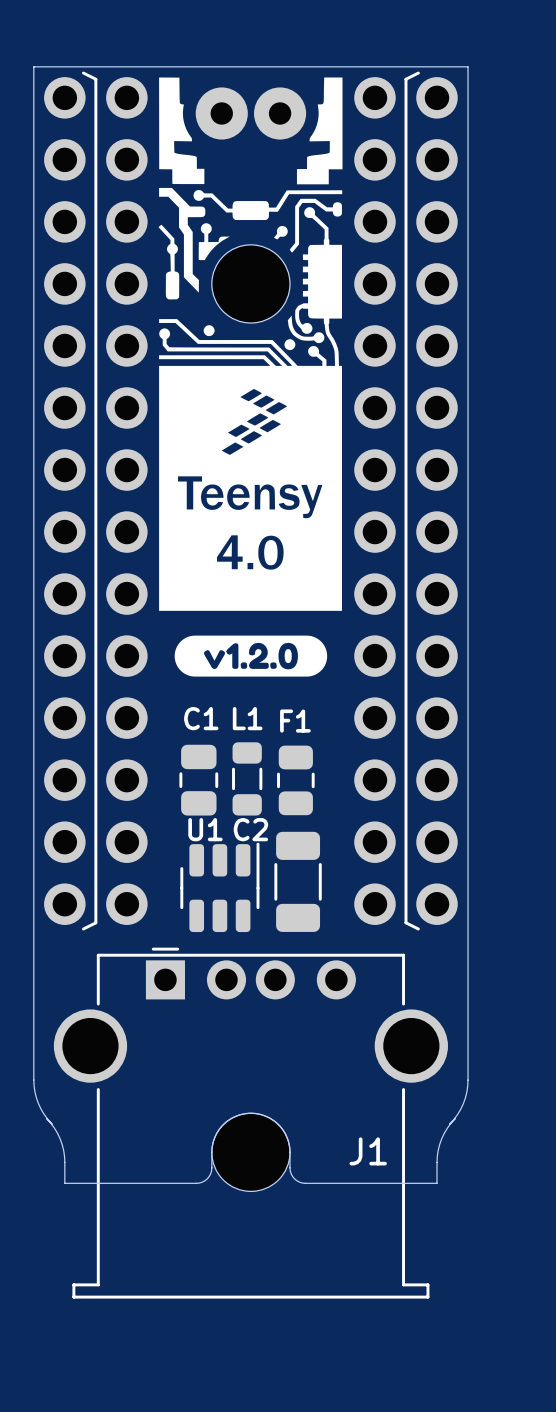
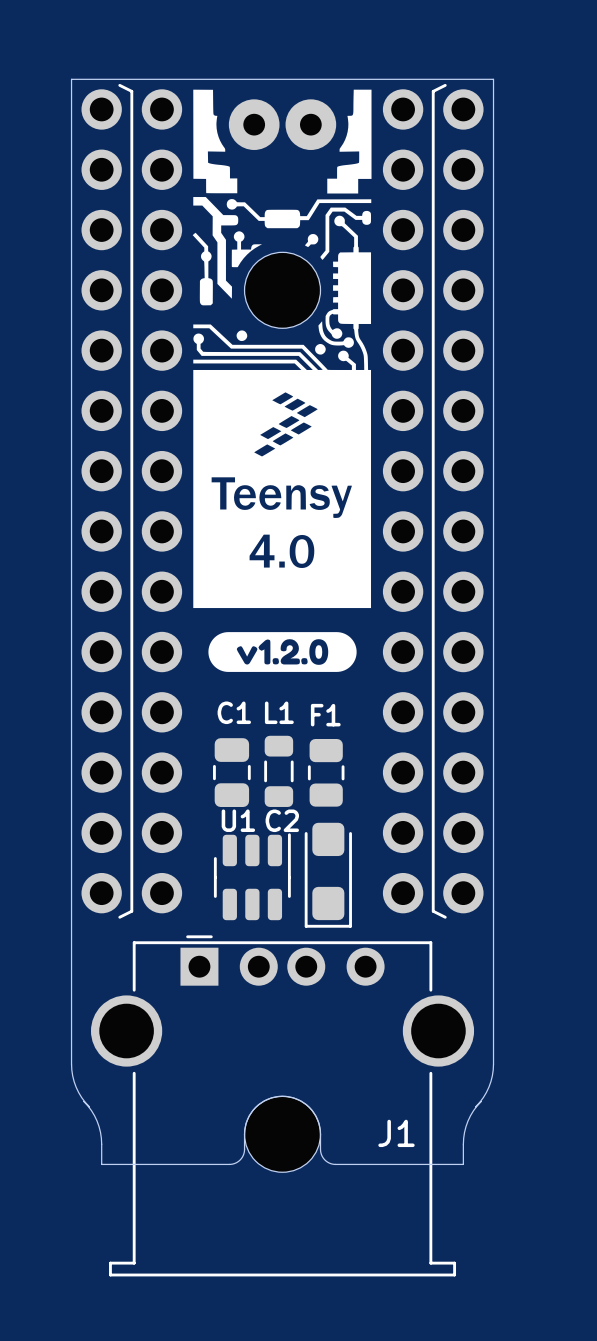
C2 footprint: [274, 831, 322, 932] -> [304, 822, 352, 928]

